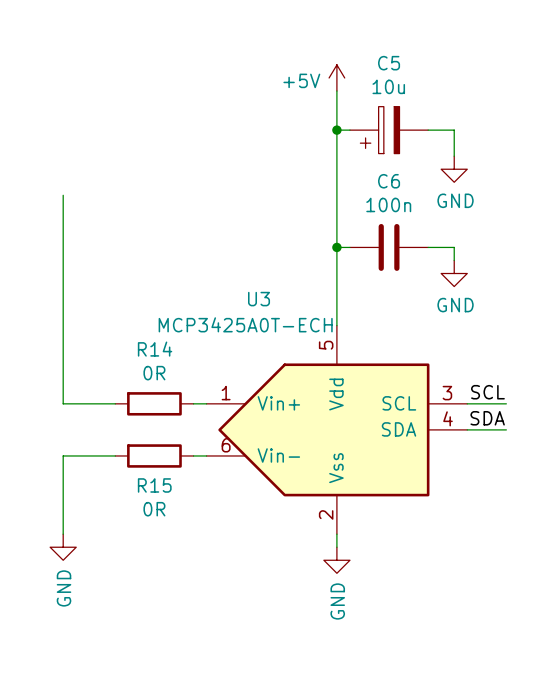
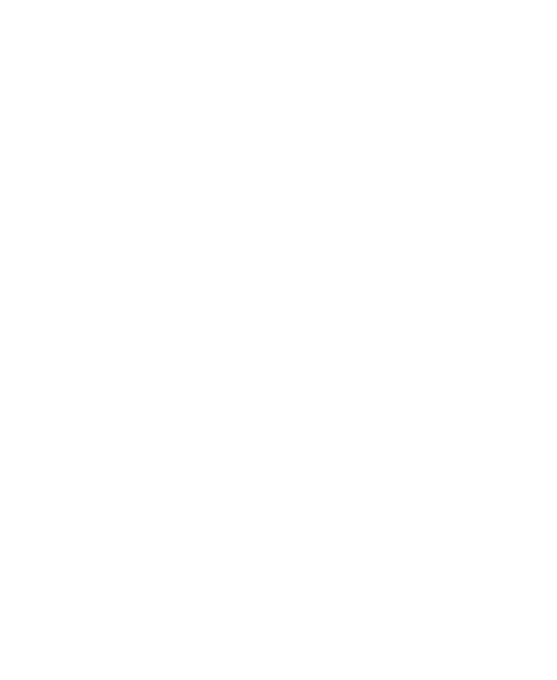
power symbol: +5V (336, 77) -> none
wire: (336, 91) (336, 325) -> none
wire: (336, 130) (349, 130) -> none
junction: (336, 130) -> none
C5: 10u (389, 130) -> none
wire: (428, 130) (454, 130) (454, 156) -> none
power symbol: GND (454, 169) -> none
wire: (63, 195) (63, 403) (115, 403) -> none
wire: (336, 247) (349, 247) -> none
junction: (336, 247) -> none
C6: 100n (389, 247) -> none
wire: (428, 247) (454, 247) (454, 260) -> none
power symbol: GND (454, 273) -> none
label: SCL (487, 392) -> none
R14: 0R (154, 403) -> none
wire: (193, 403) (206, 403) -> none
wire: (467, 403) (506, 403) -> none
label: SDA (487, 418) -> none
U3: MCP3425A0T-ECH (336, 429) -> none
wire: (467, 429) (506, 429) -> none
wire: (115, 455) (63, 455) (63, 534) -> none
R15: 0R (154, 455) -> none
wire: (193, 455) (206, 455) -> none
wire: (336, 534) (336, 547) -> none
power symbol: GND (63, 547) -> none
power symbol: GND (336, 560) -> none

